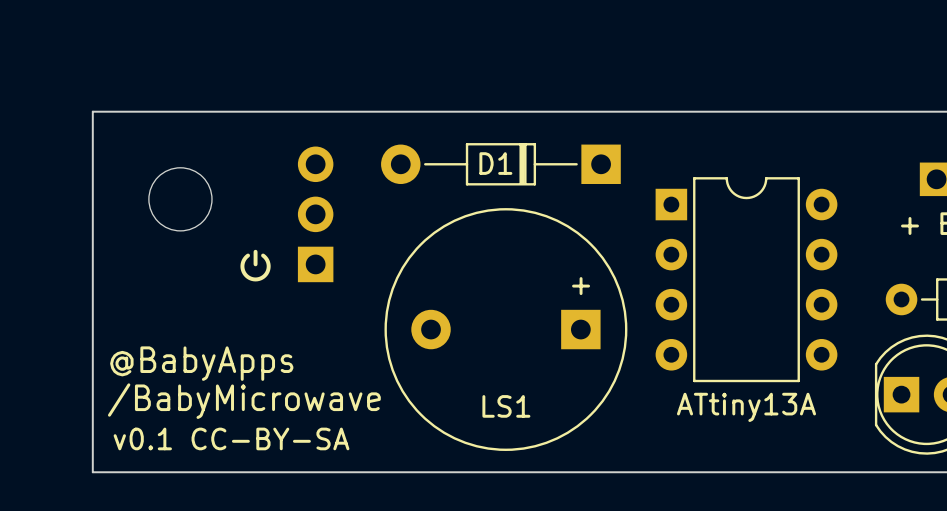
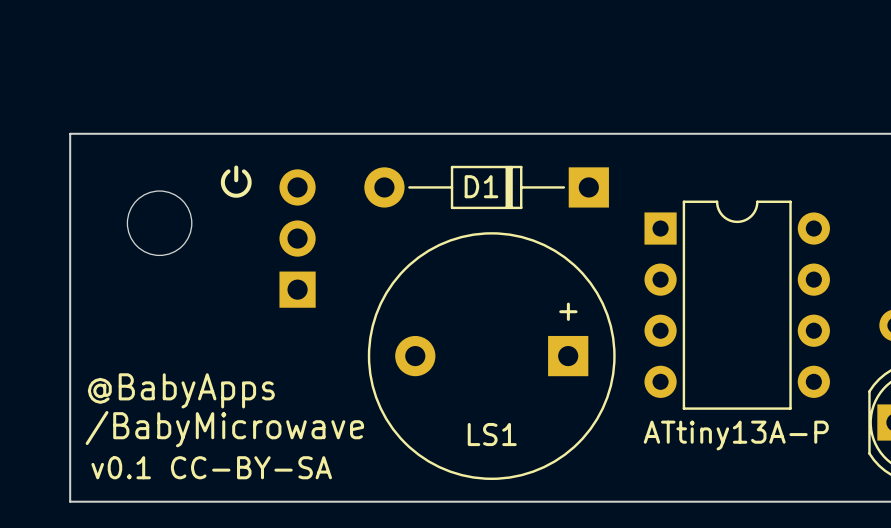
line: (255, 251) (255, 264) -> (236, 167) (236, 180)
line: (248, 255) (243, 262) (243, 270) (247, 276) (255, 279) (263, 276) (268, 270) (267, 262) (263, 255) -> (228, 171) (223, 178) (223, 186) (228, 193) (236, 195) (244, 193) (249, 186) (248, 178) (243, 171)
part value: ATtiny13A (746, 407) -> ATtiny13A-P (736, 435)

